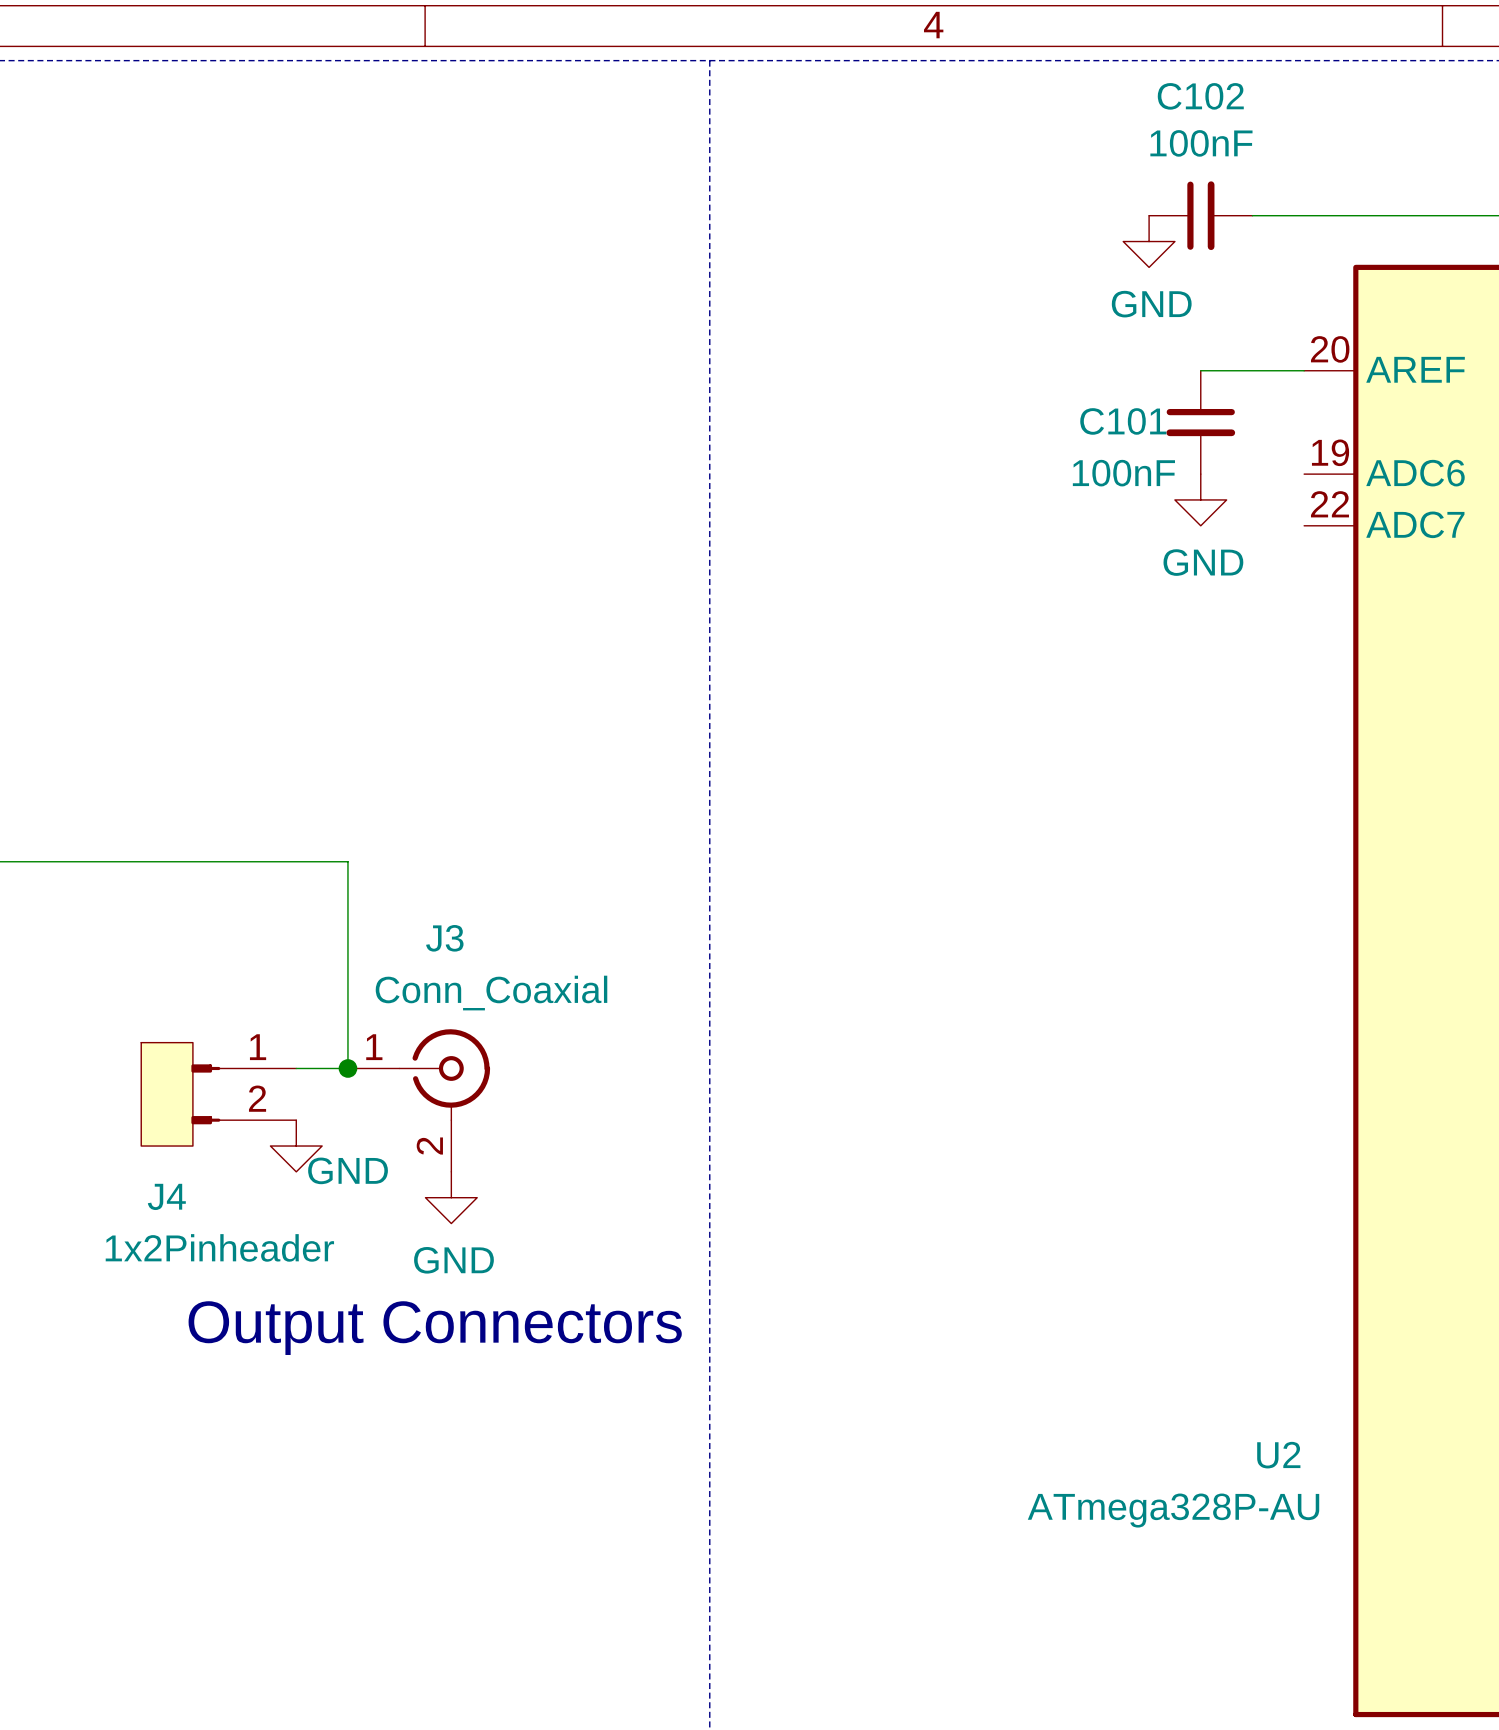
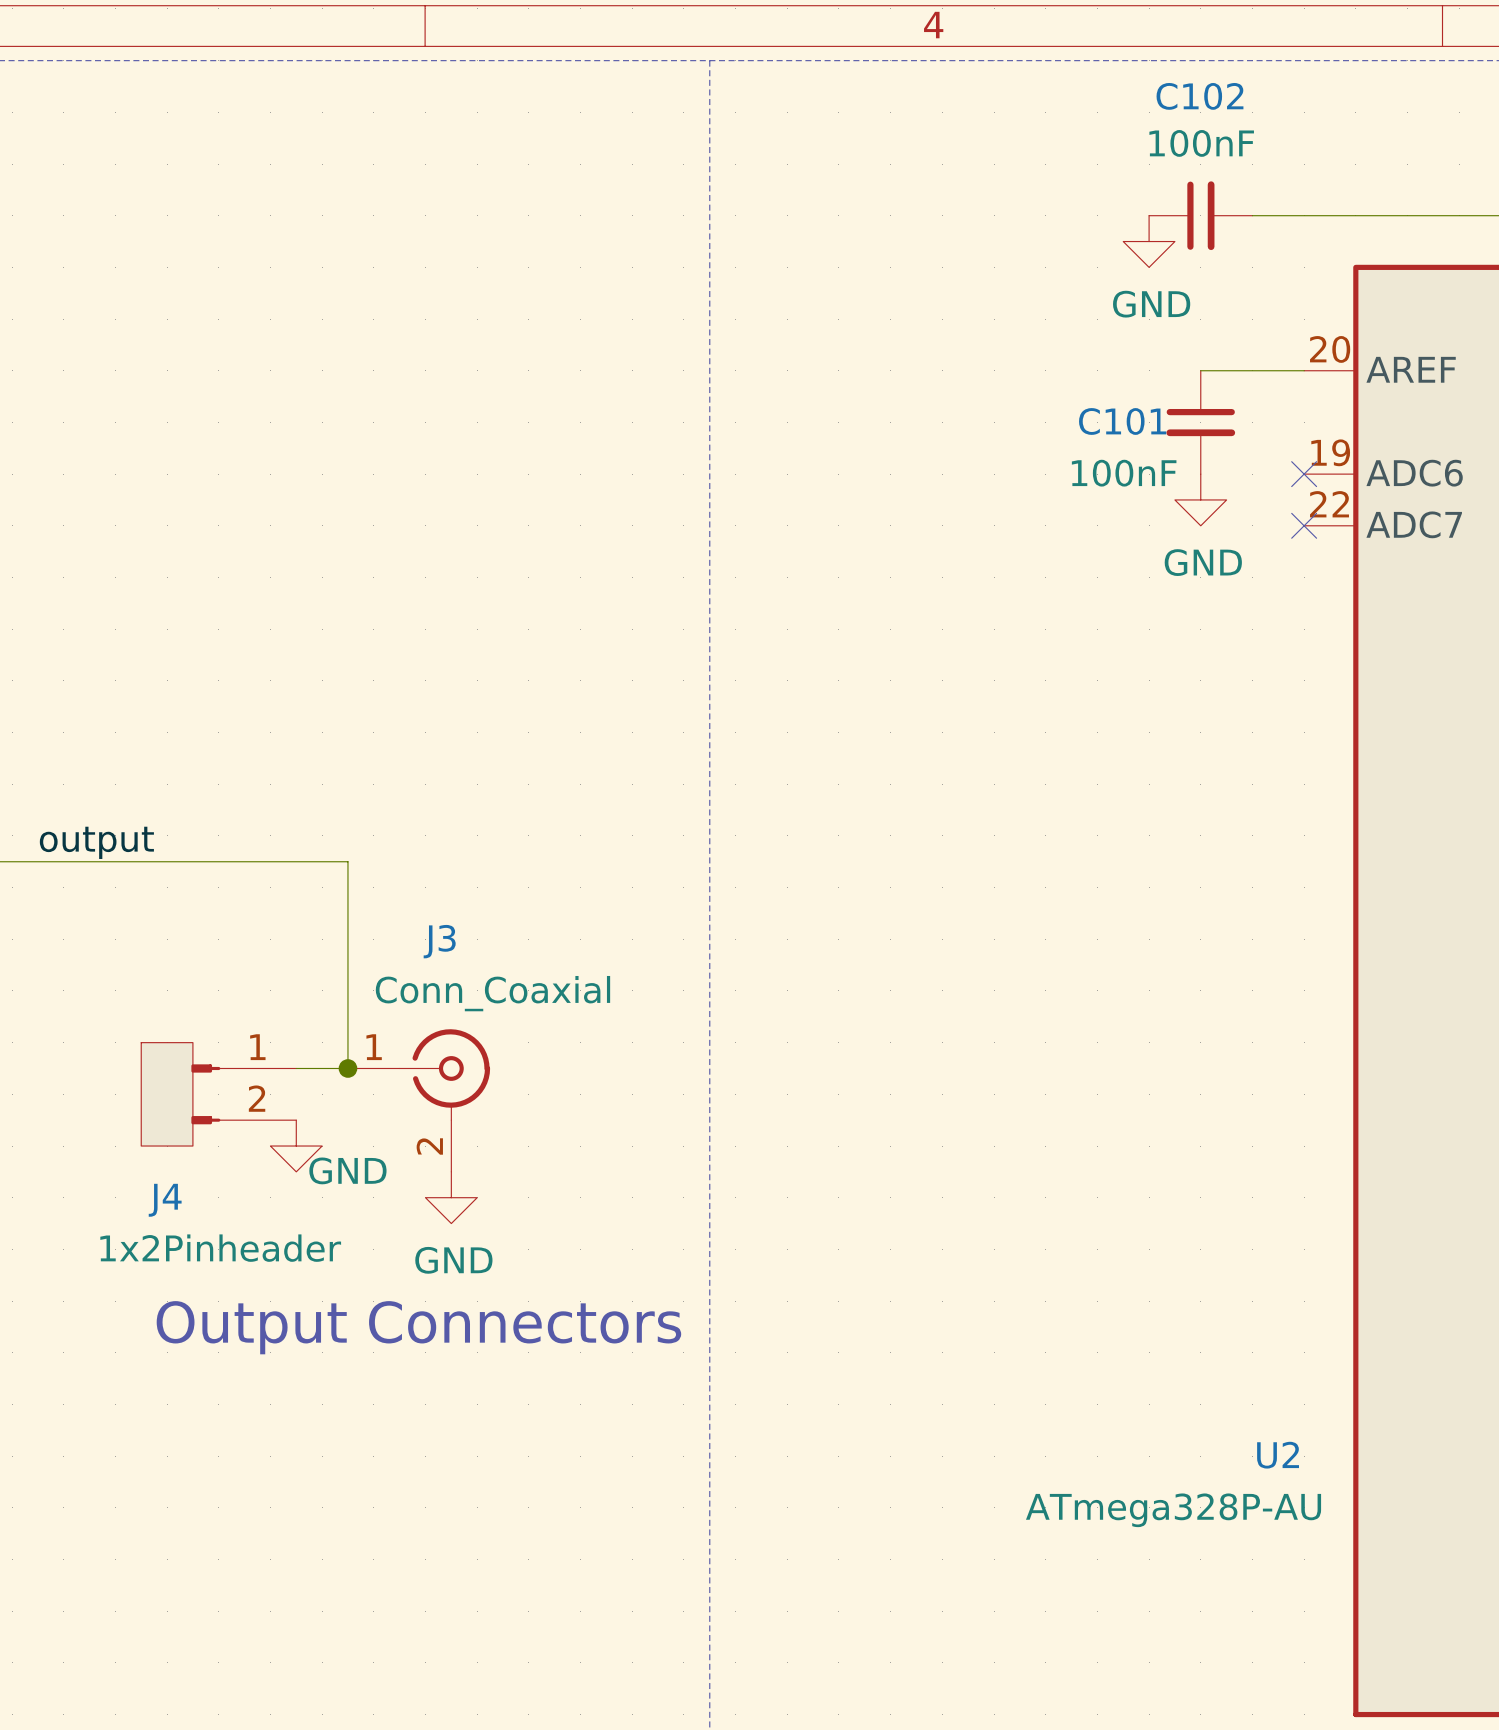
no-connect mark: none -> (1304, 474)
no-connect mark: none -> (1304, 525)
label: none -> output (96, 842)

